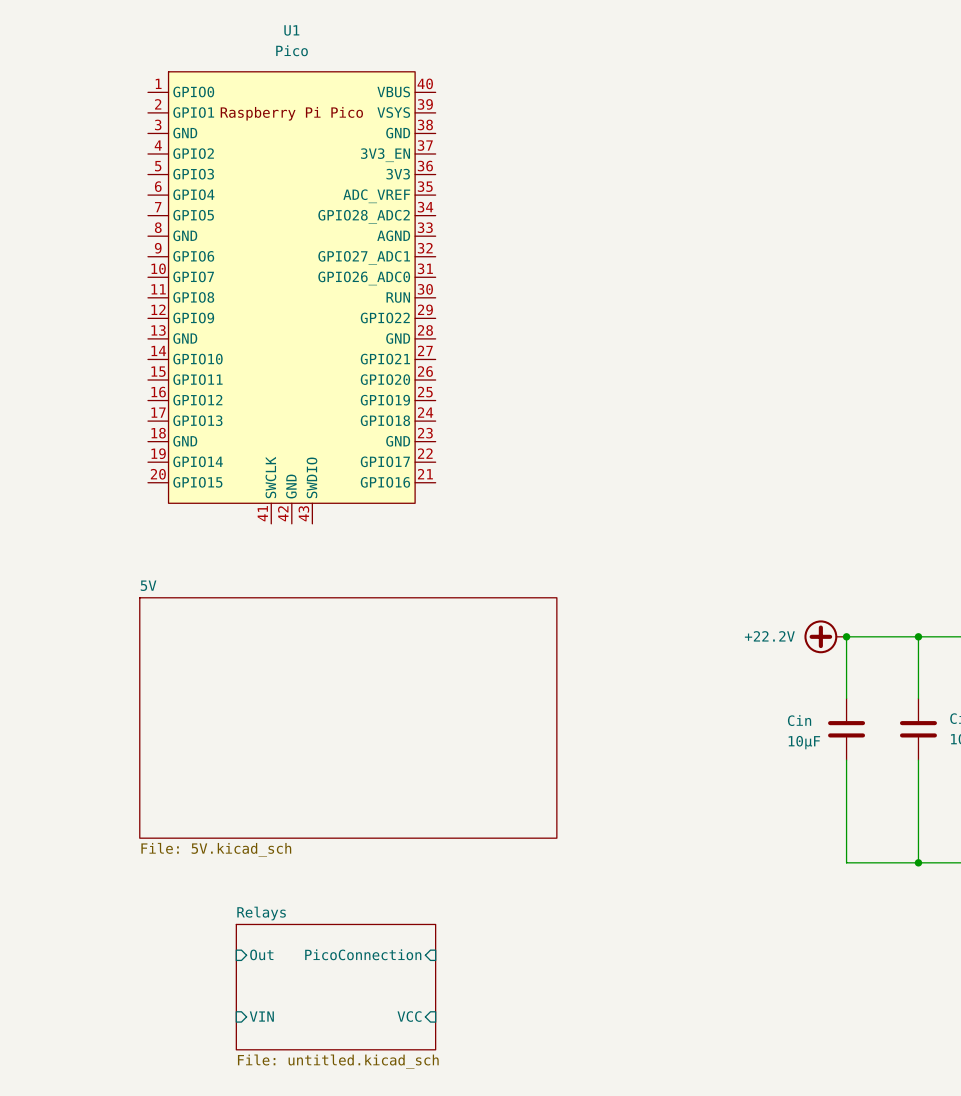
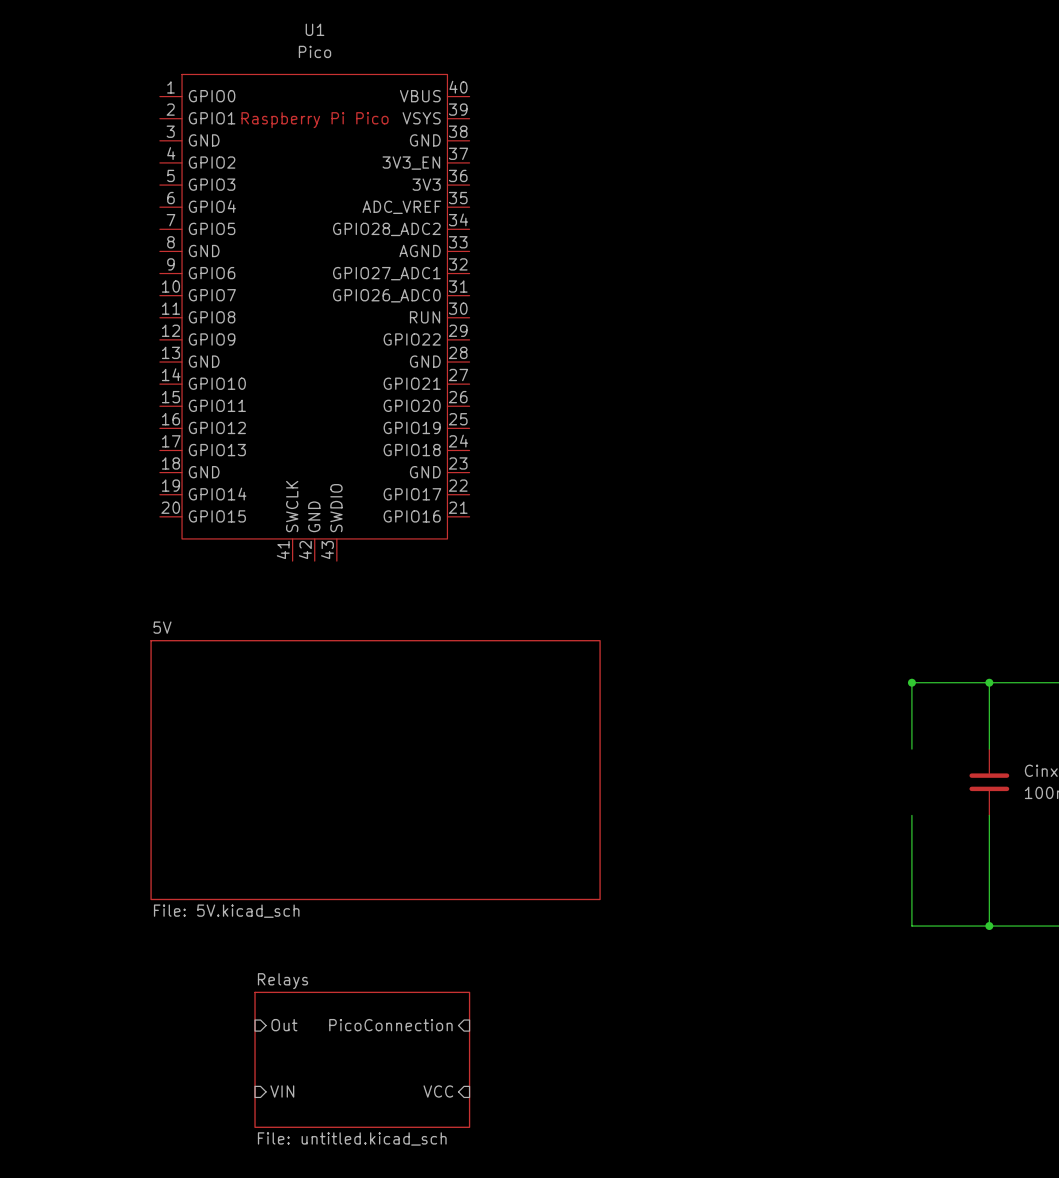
power symbol: +22.2V (825, 636) -> none
Cin: 10µF (846, 729) -> none

